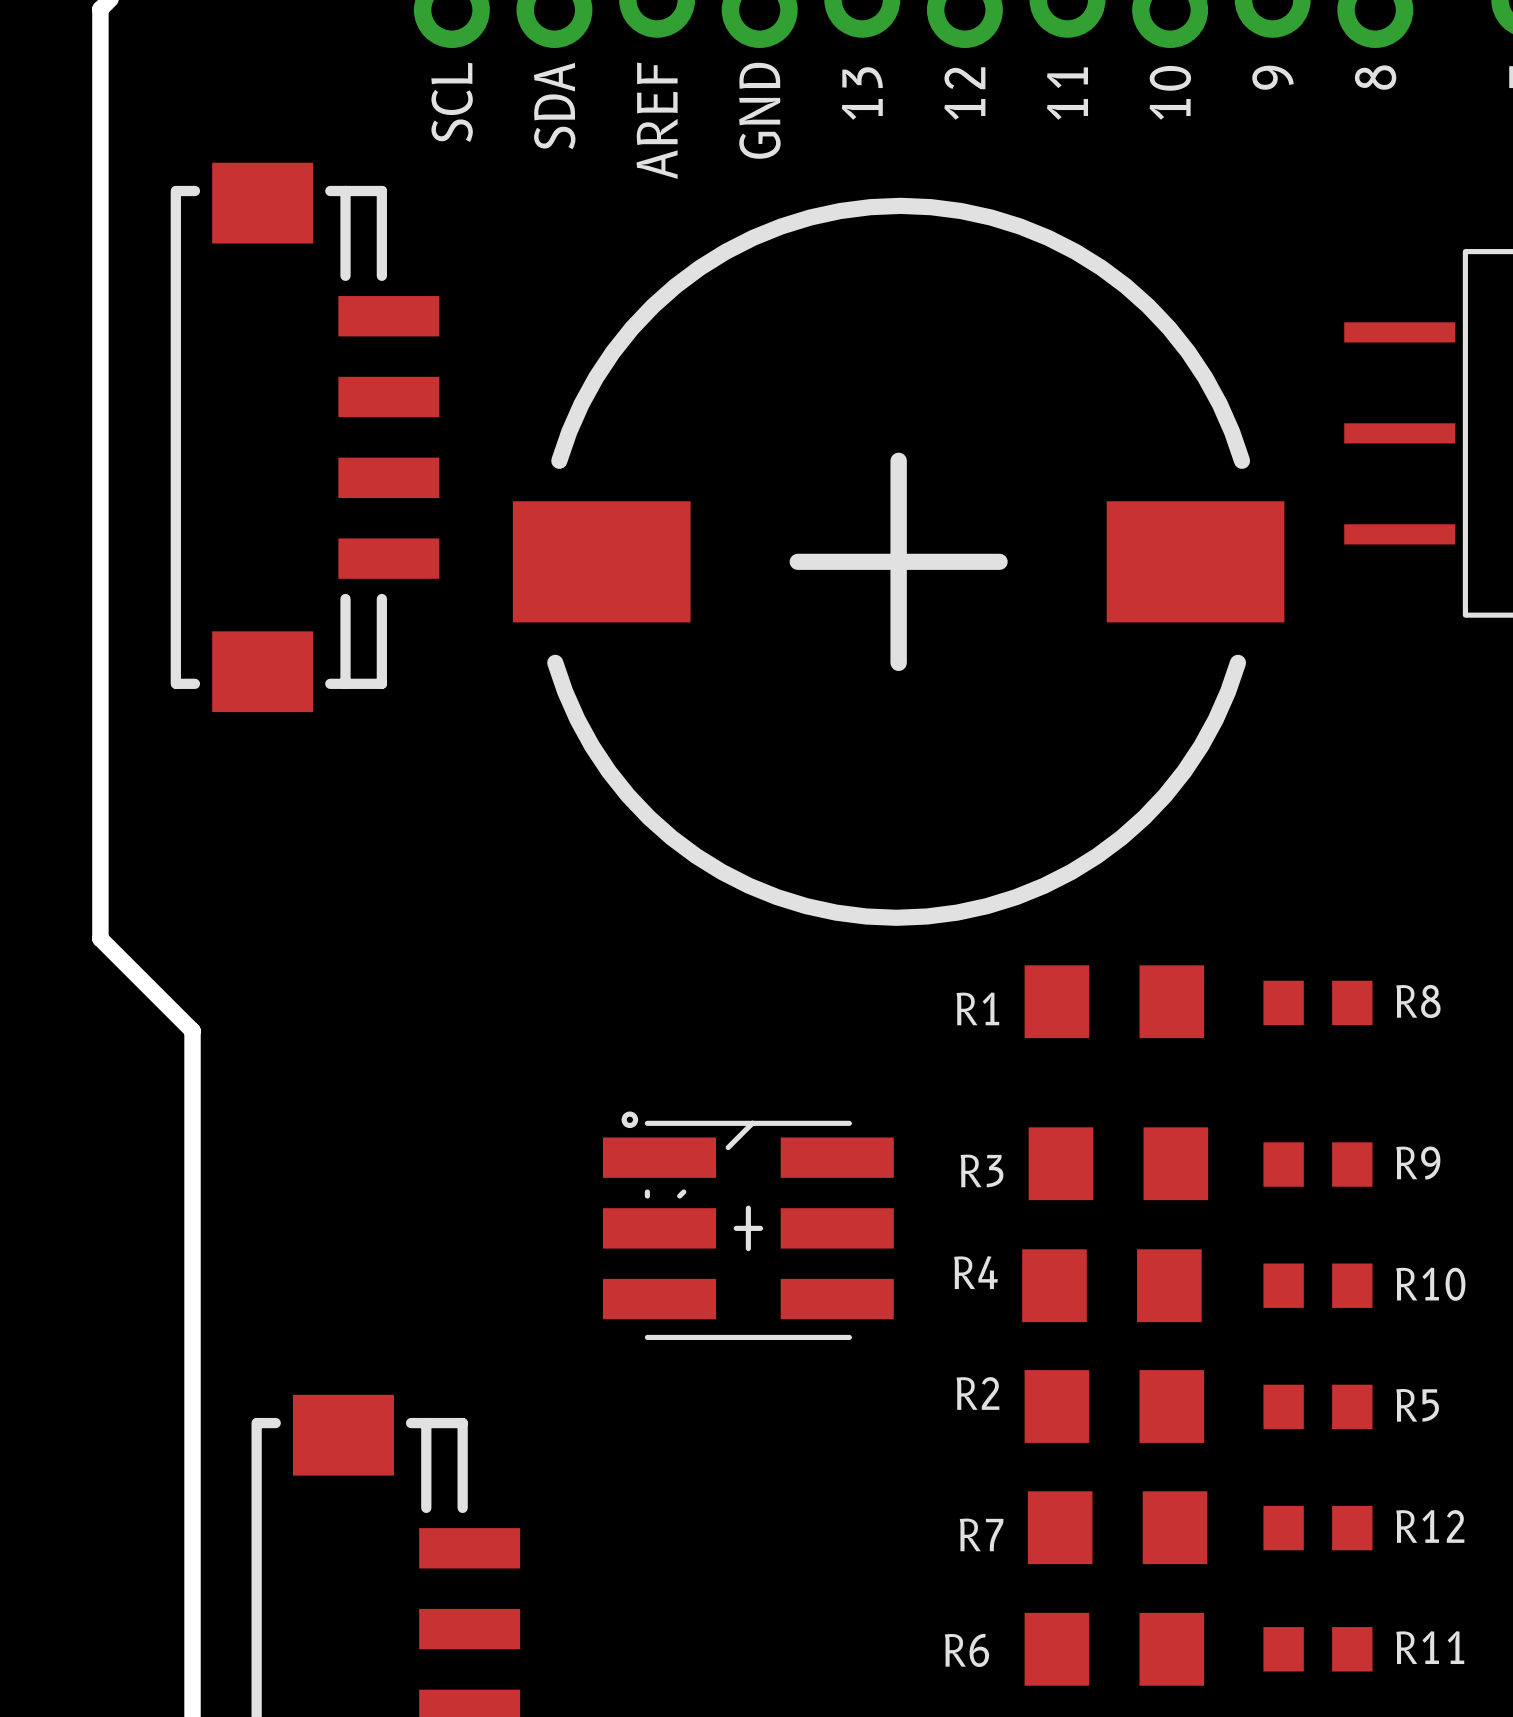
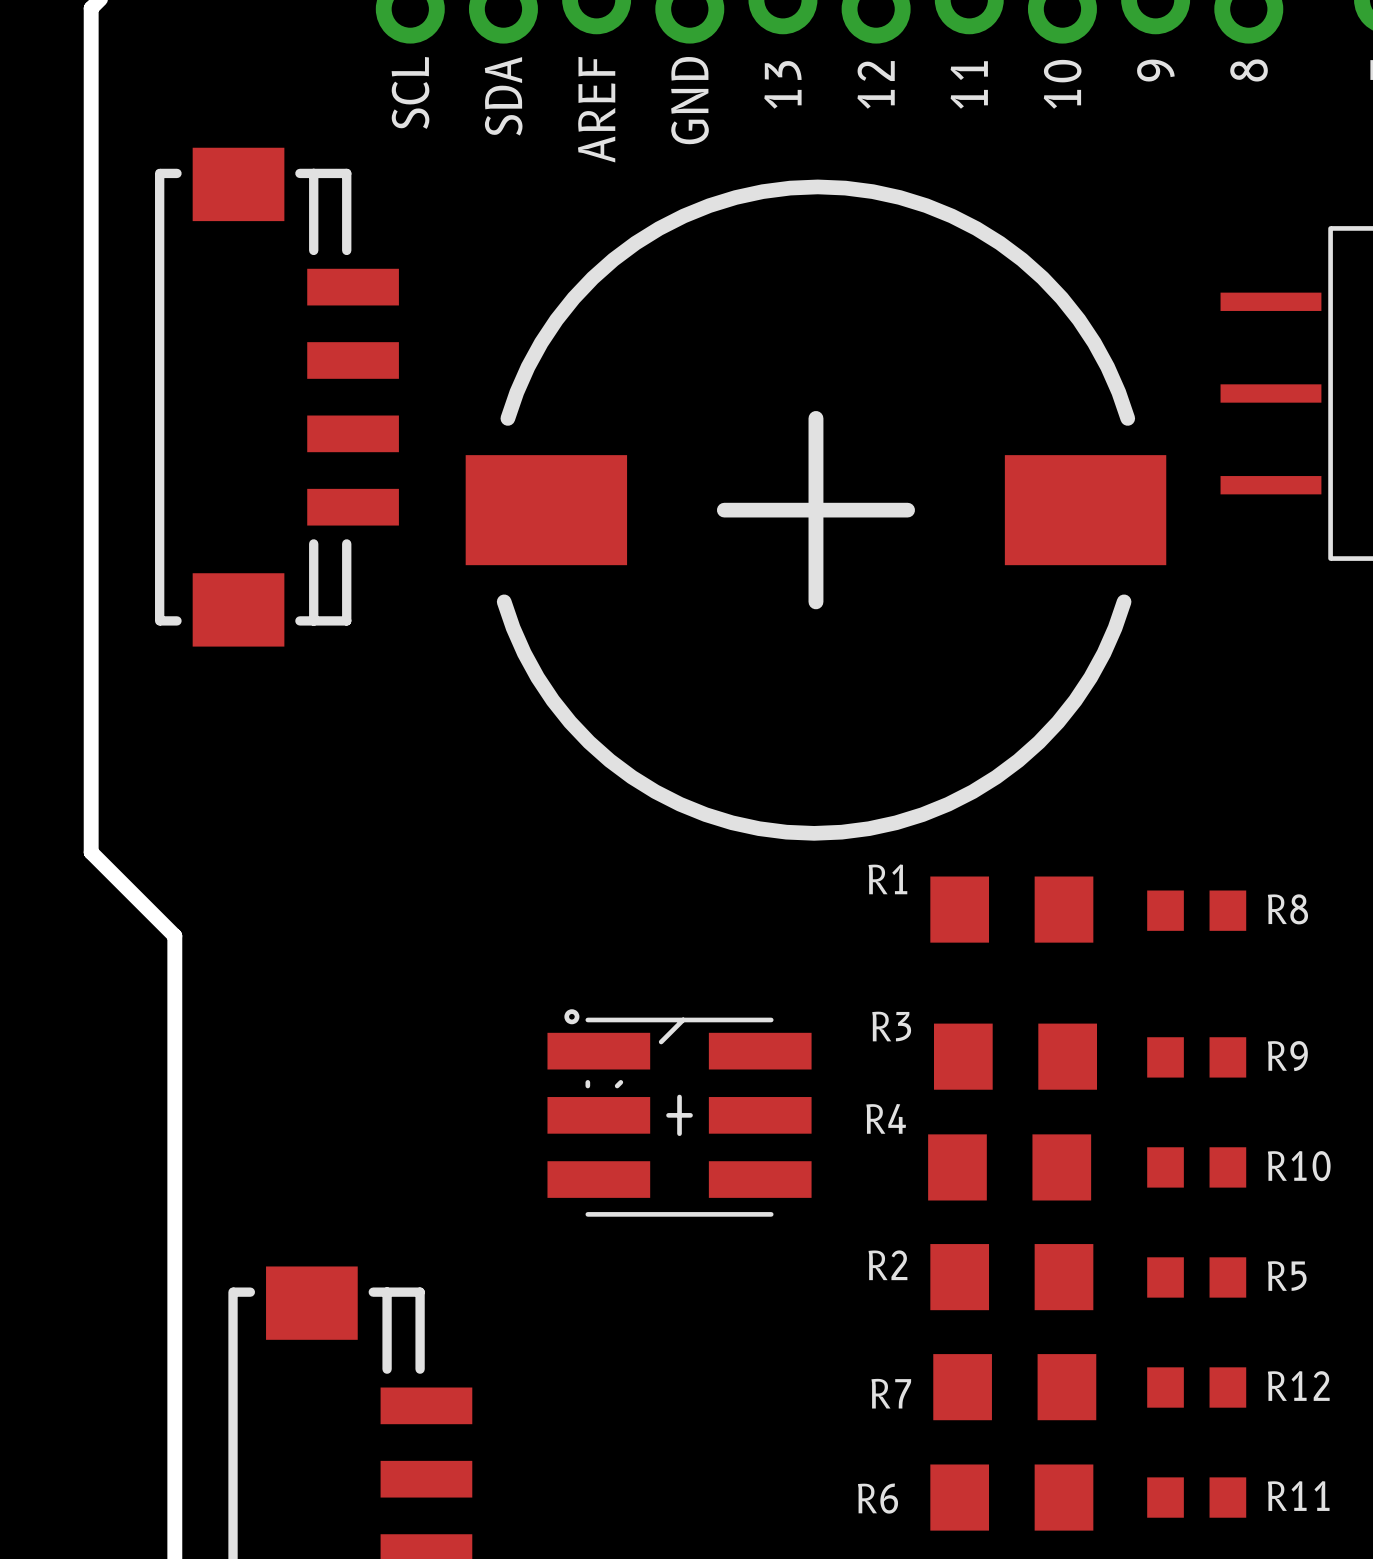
R1 name position: R1 (977, 1008) -> R1 (887, 879)
R3 name position: R3 (982, 1170) -> R3 (891, 1026)
R4 name position: R4 (975, 1272) -> R4 (886, 1118)

